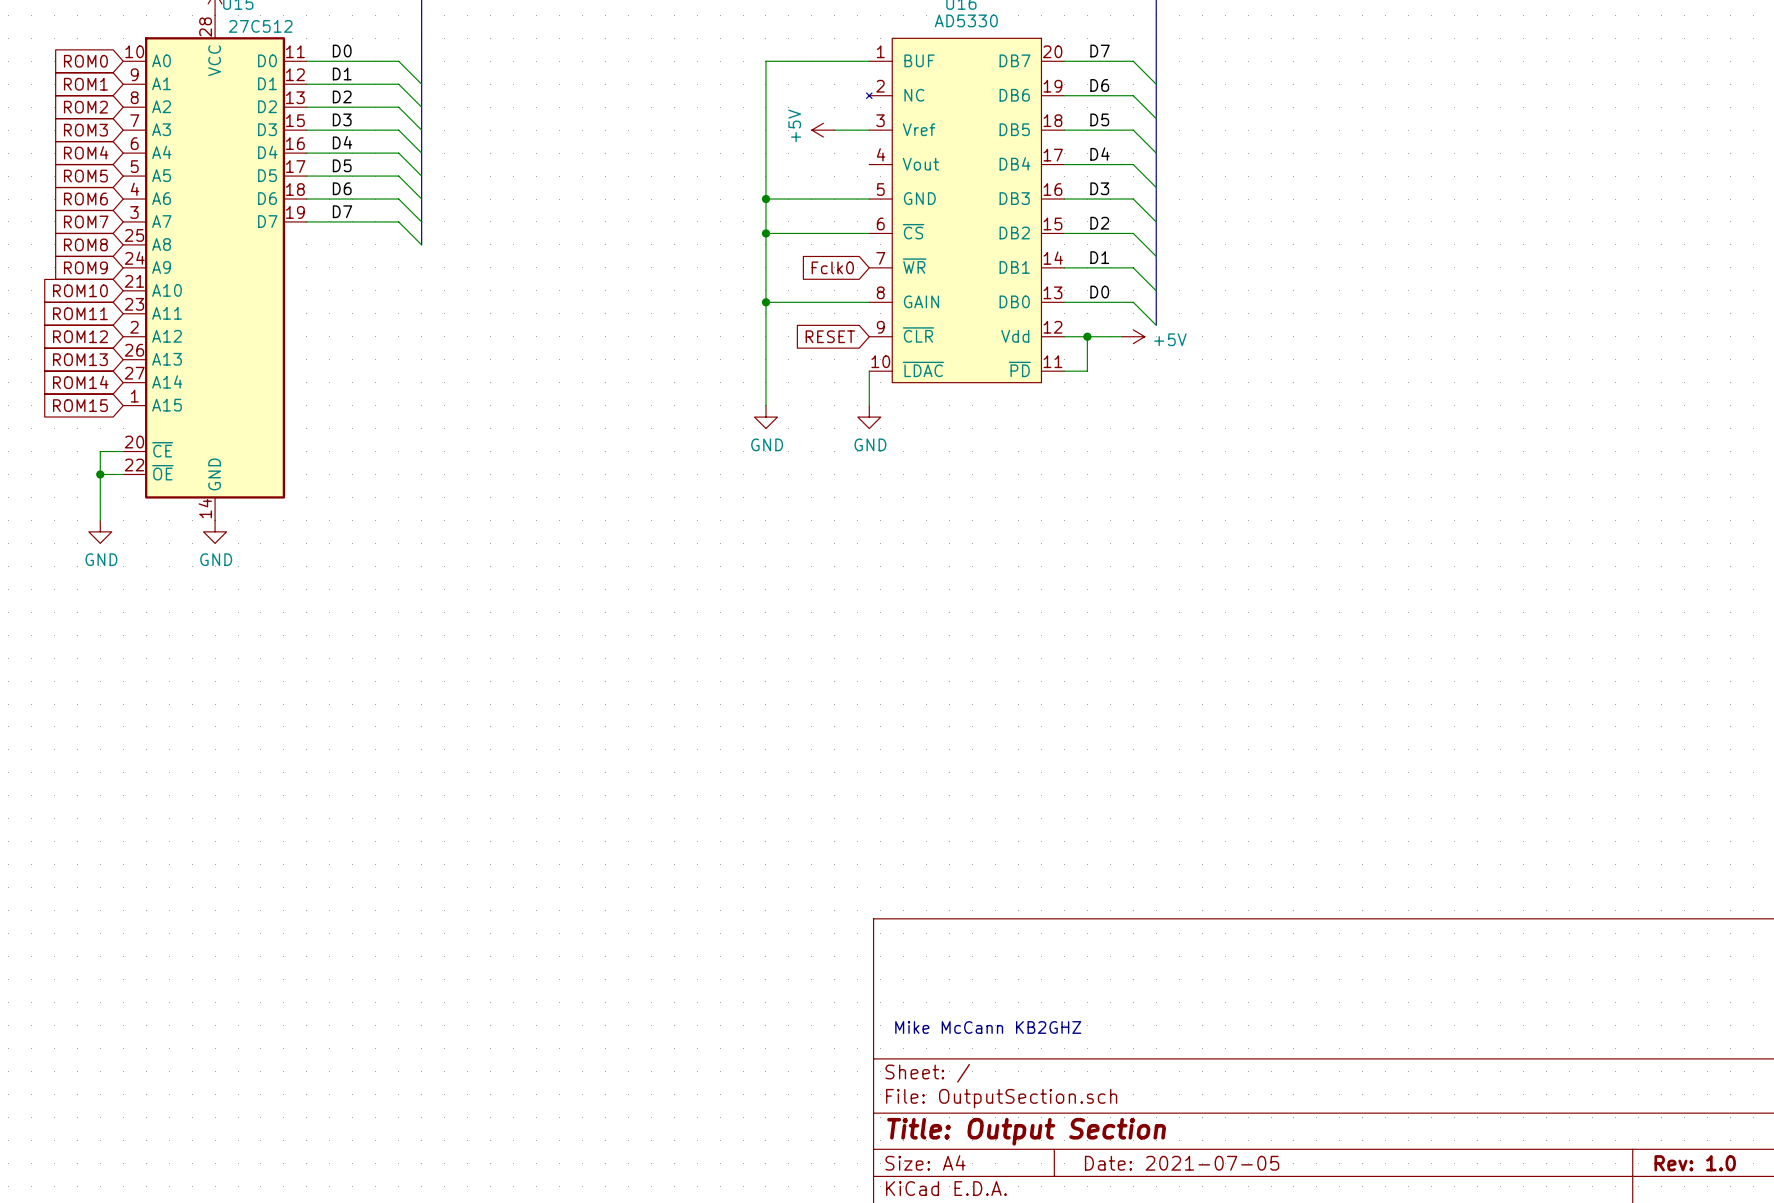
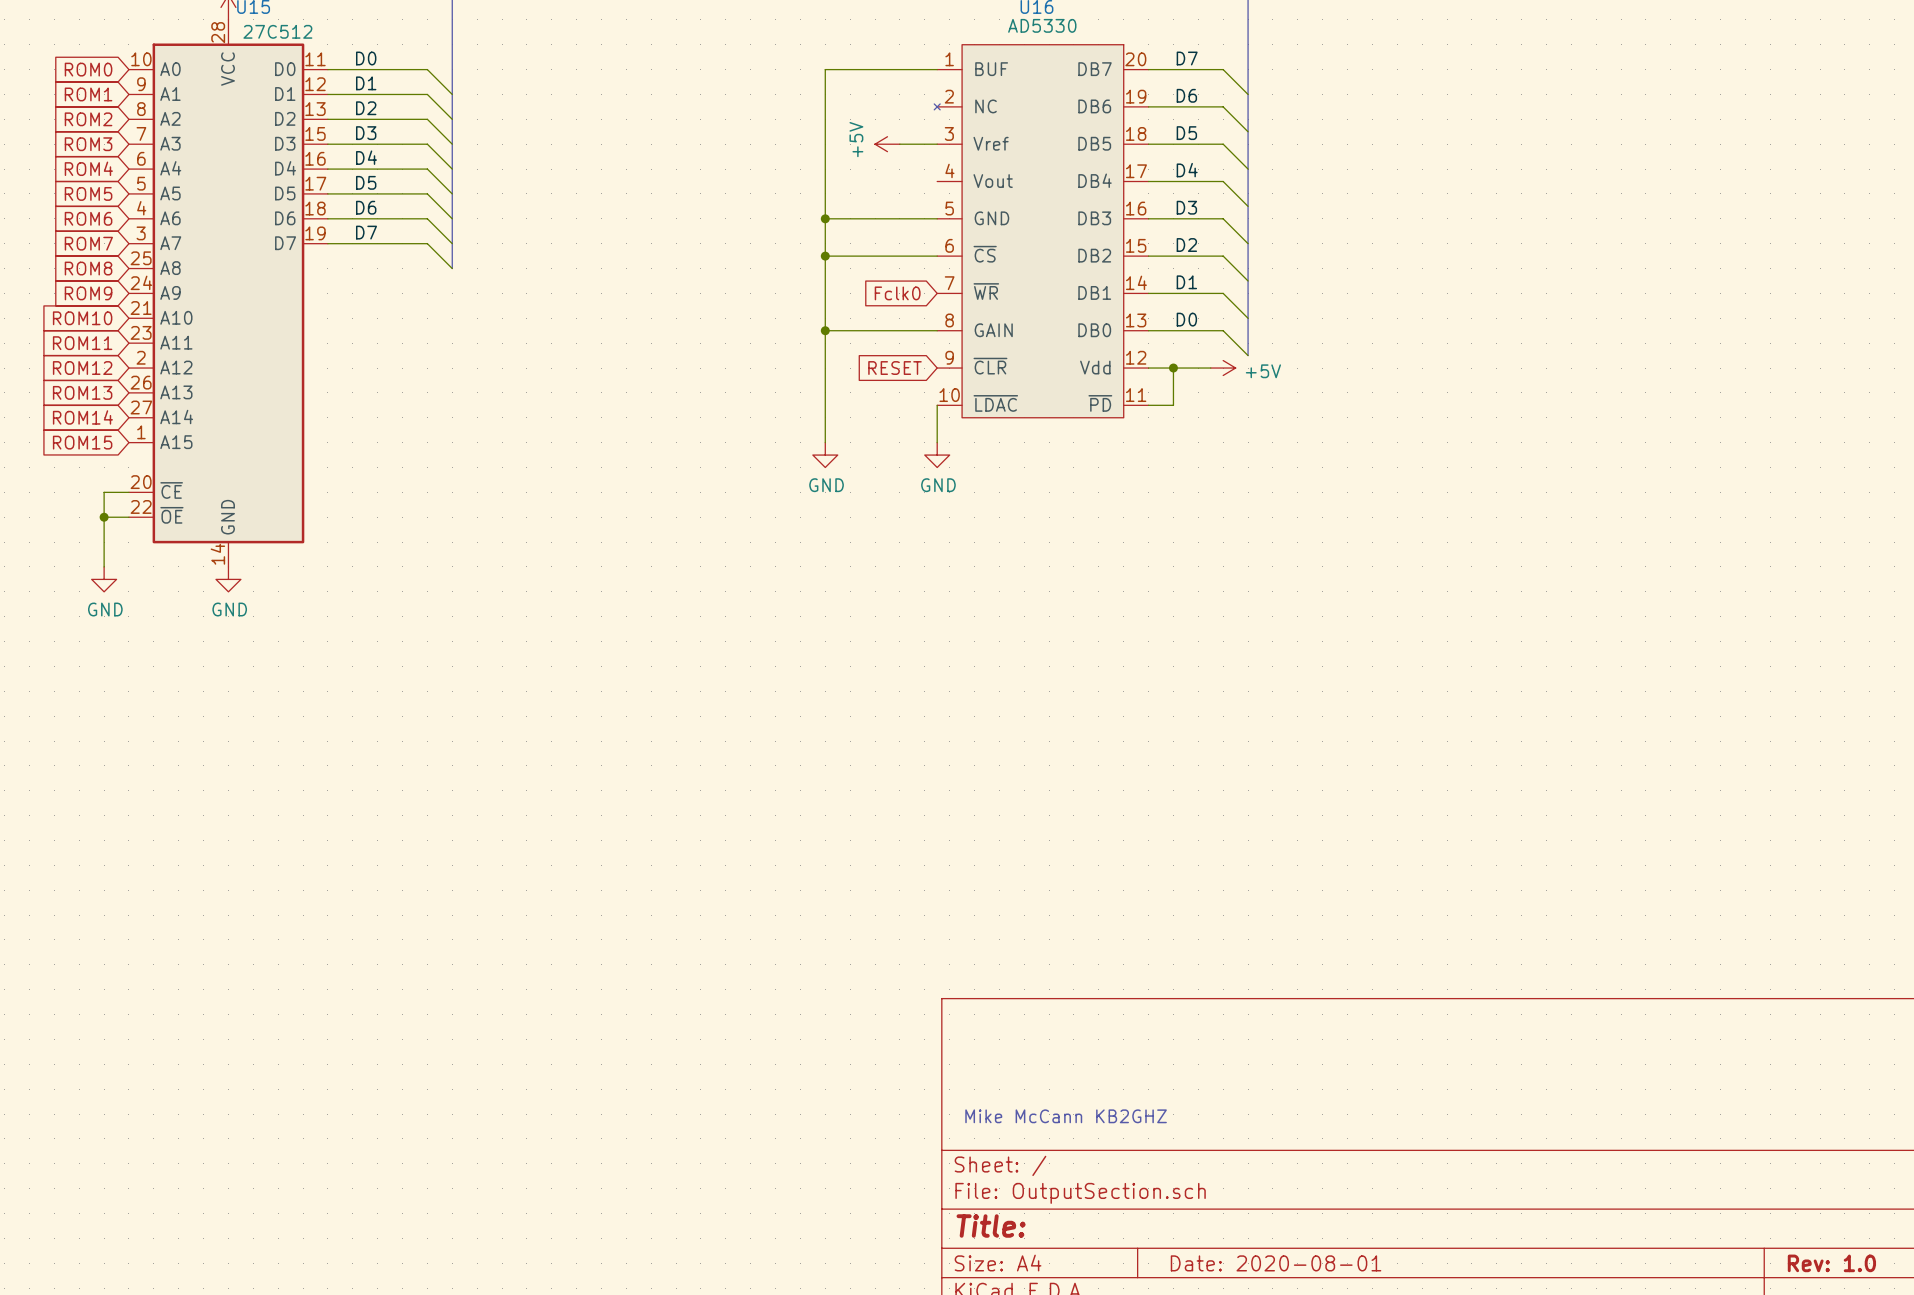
title block: Title: Output Section (1026, 1131) -> Title: (991, 1226)
title block: Date: 2021-07-05 (1182, 1163) -> Date: 2020-08-01 (1276, 1263)

